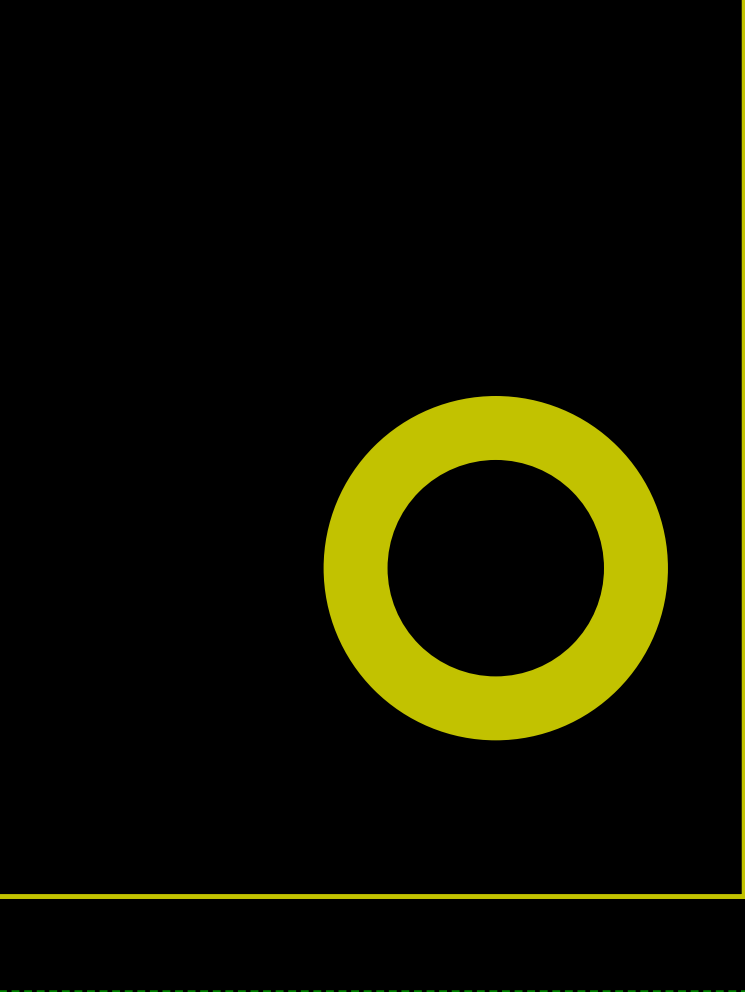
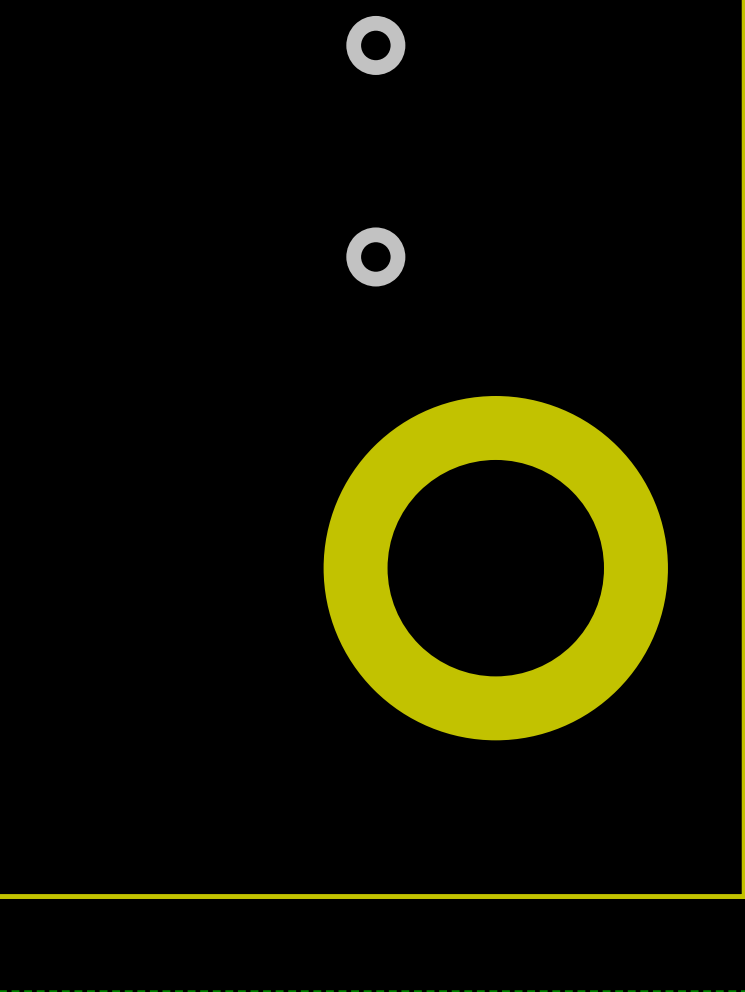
via: none -> (375, 45)
via: none -> (375, 256)

